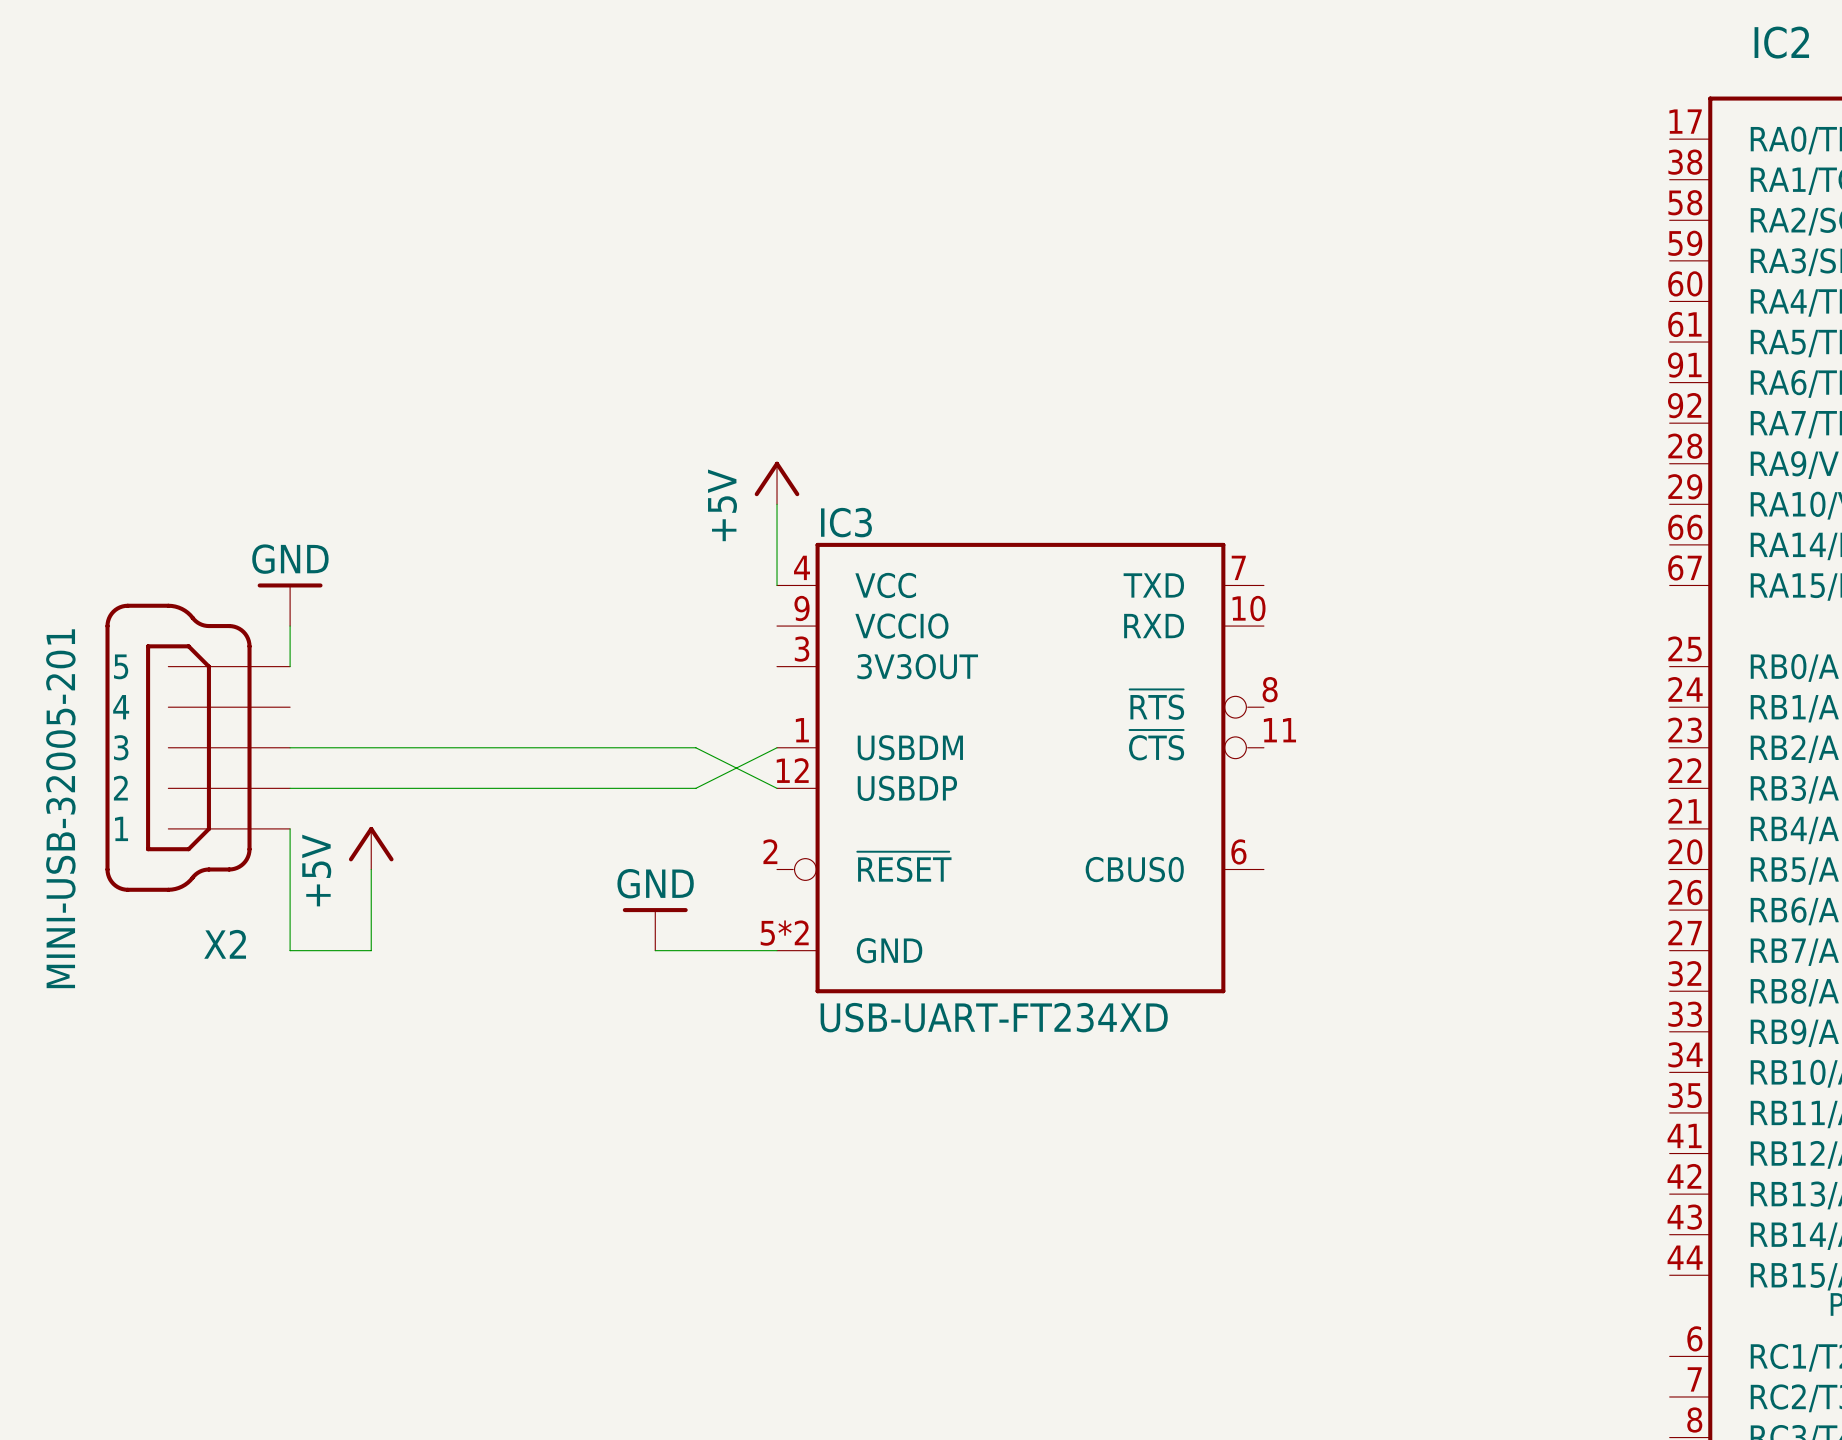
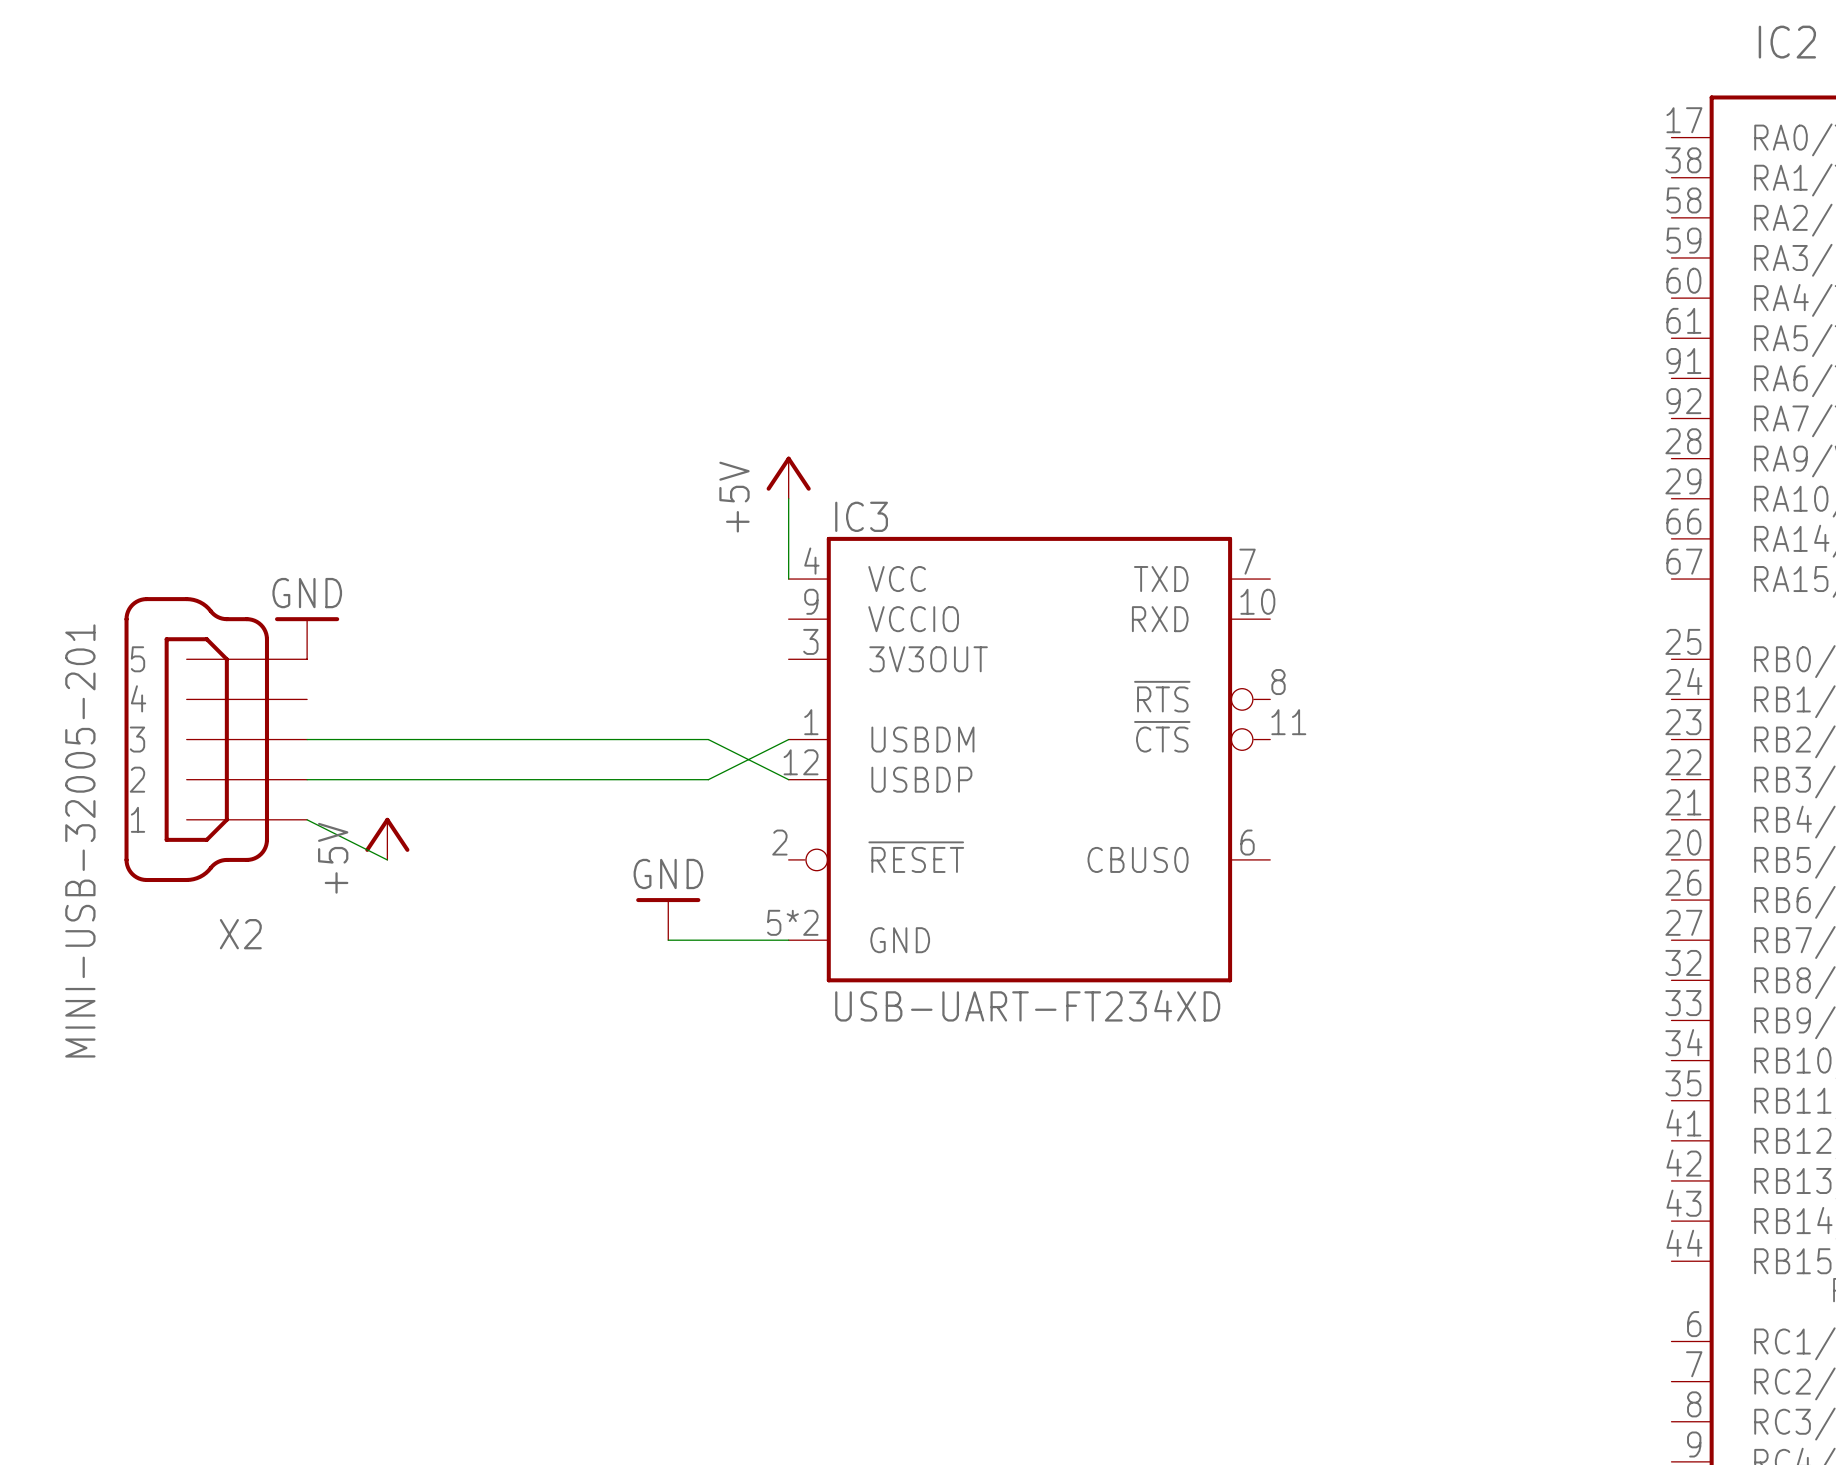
power symbol position: GND (290, 604) -> GND (307, 638)
wire: (290, 828) (290, 950) (371, 950) (371, 869) -> (307, 819) (387, 859)

